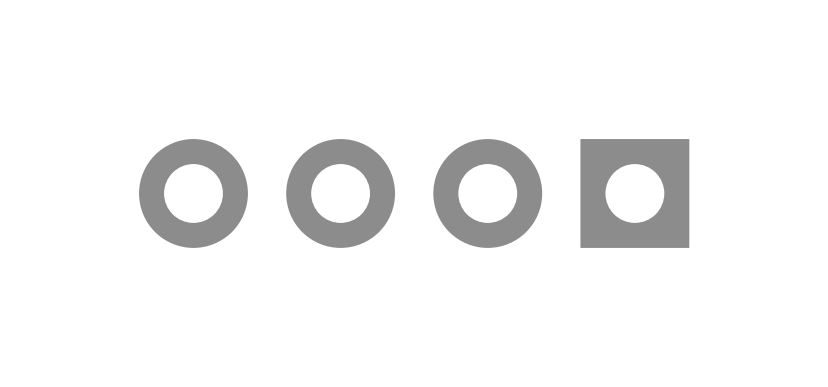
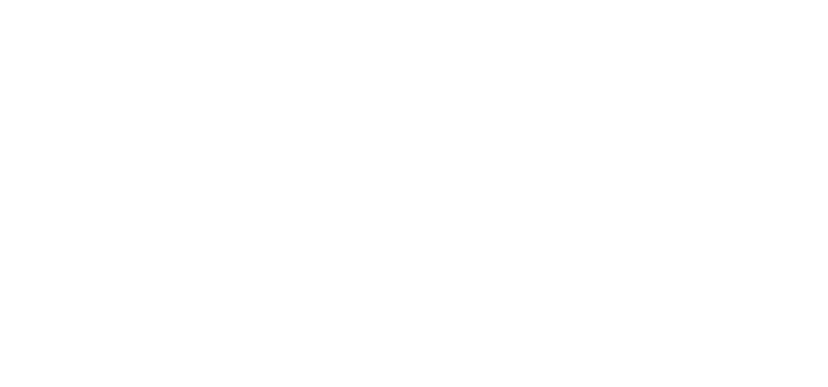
part: (414, 193) -> none

